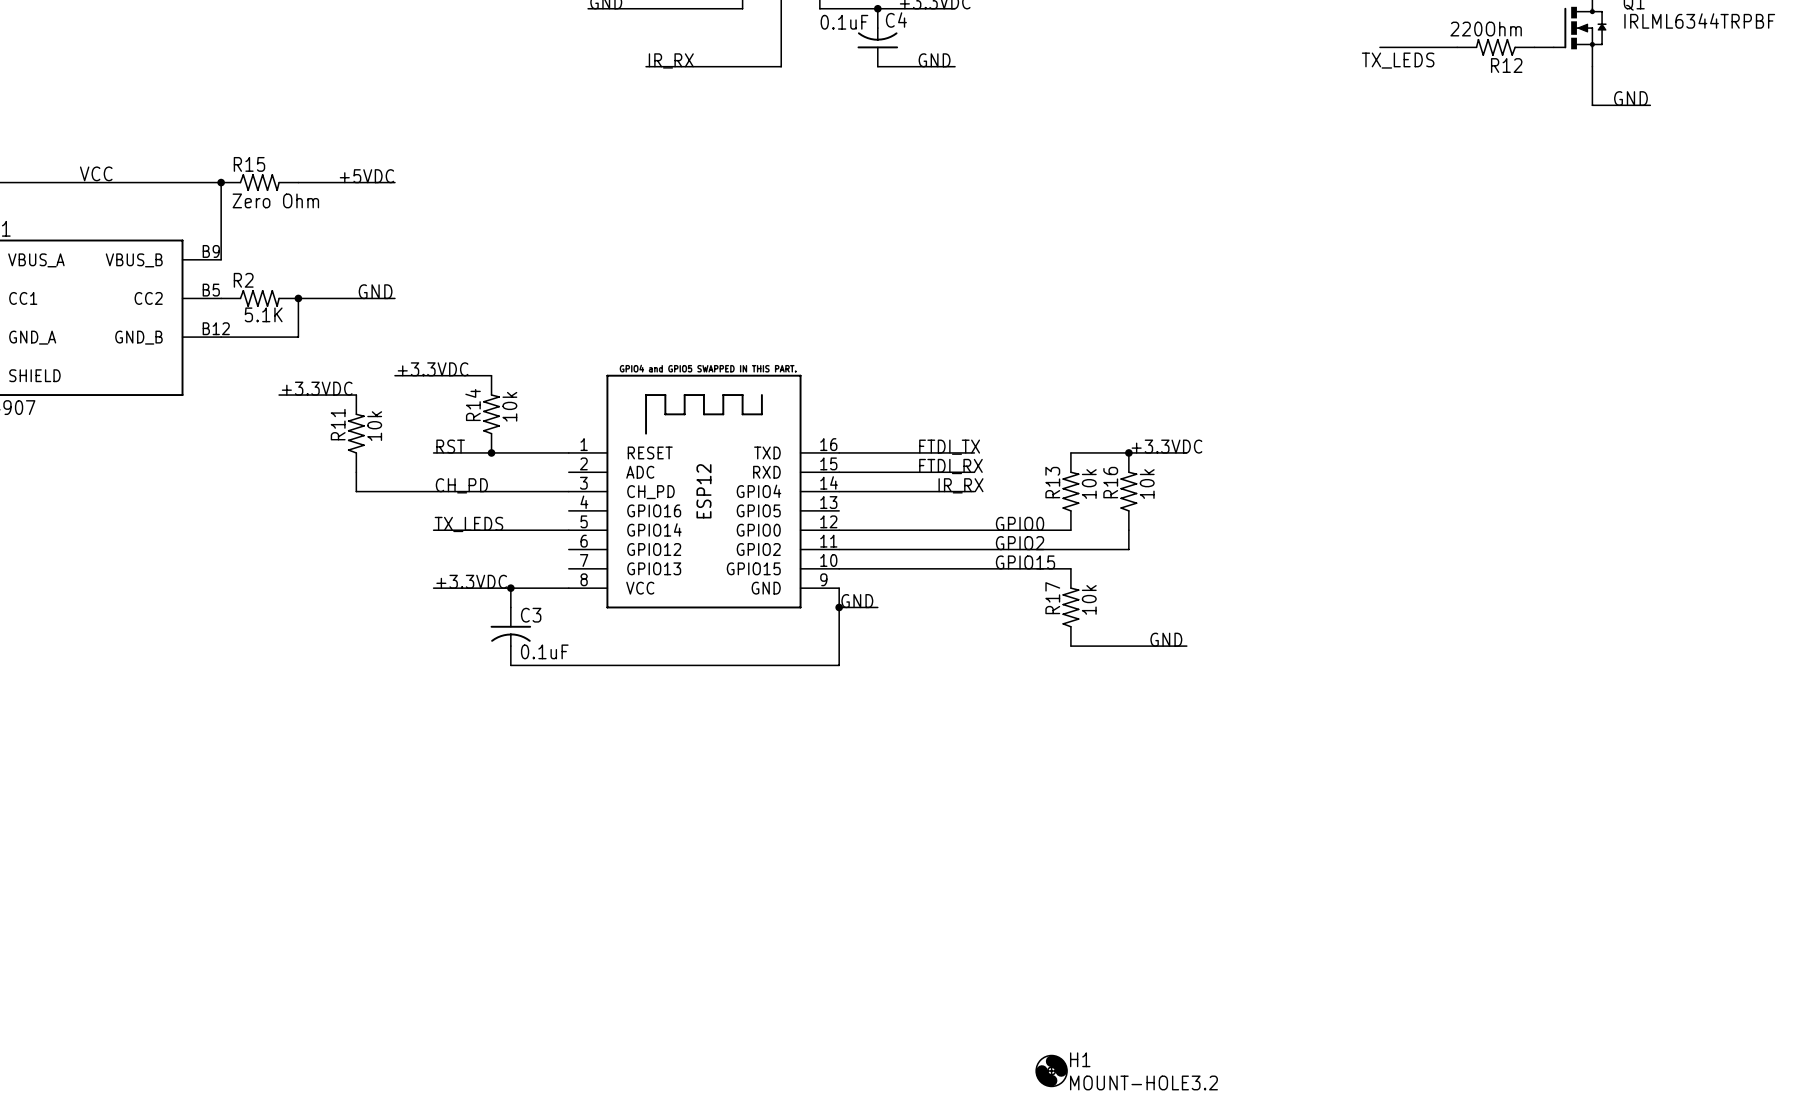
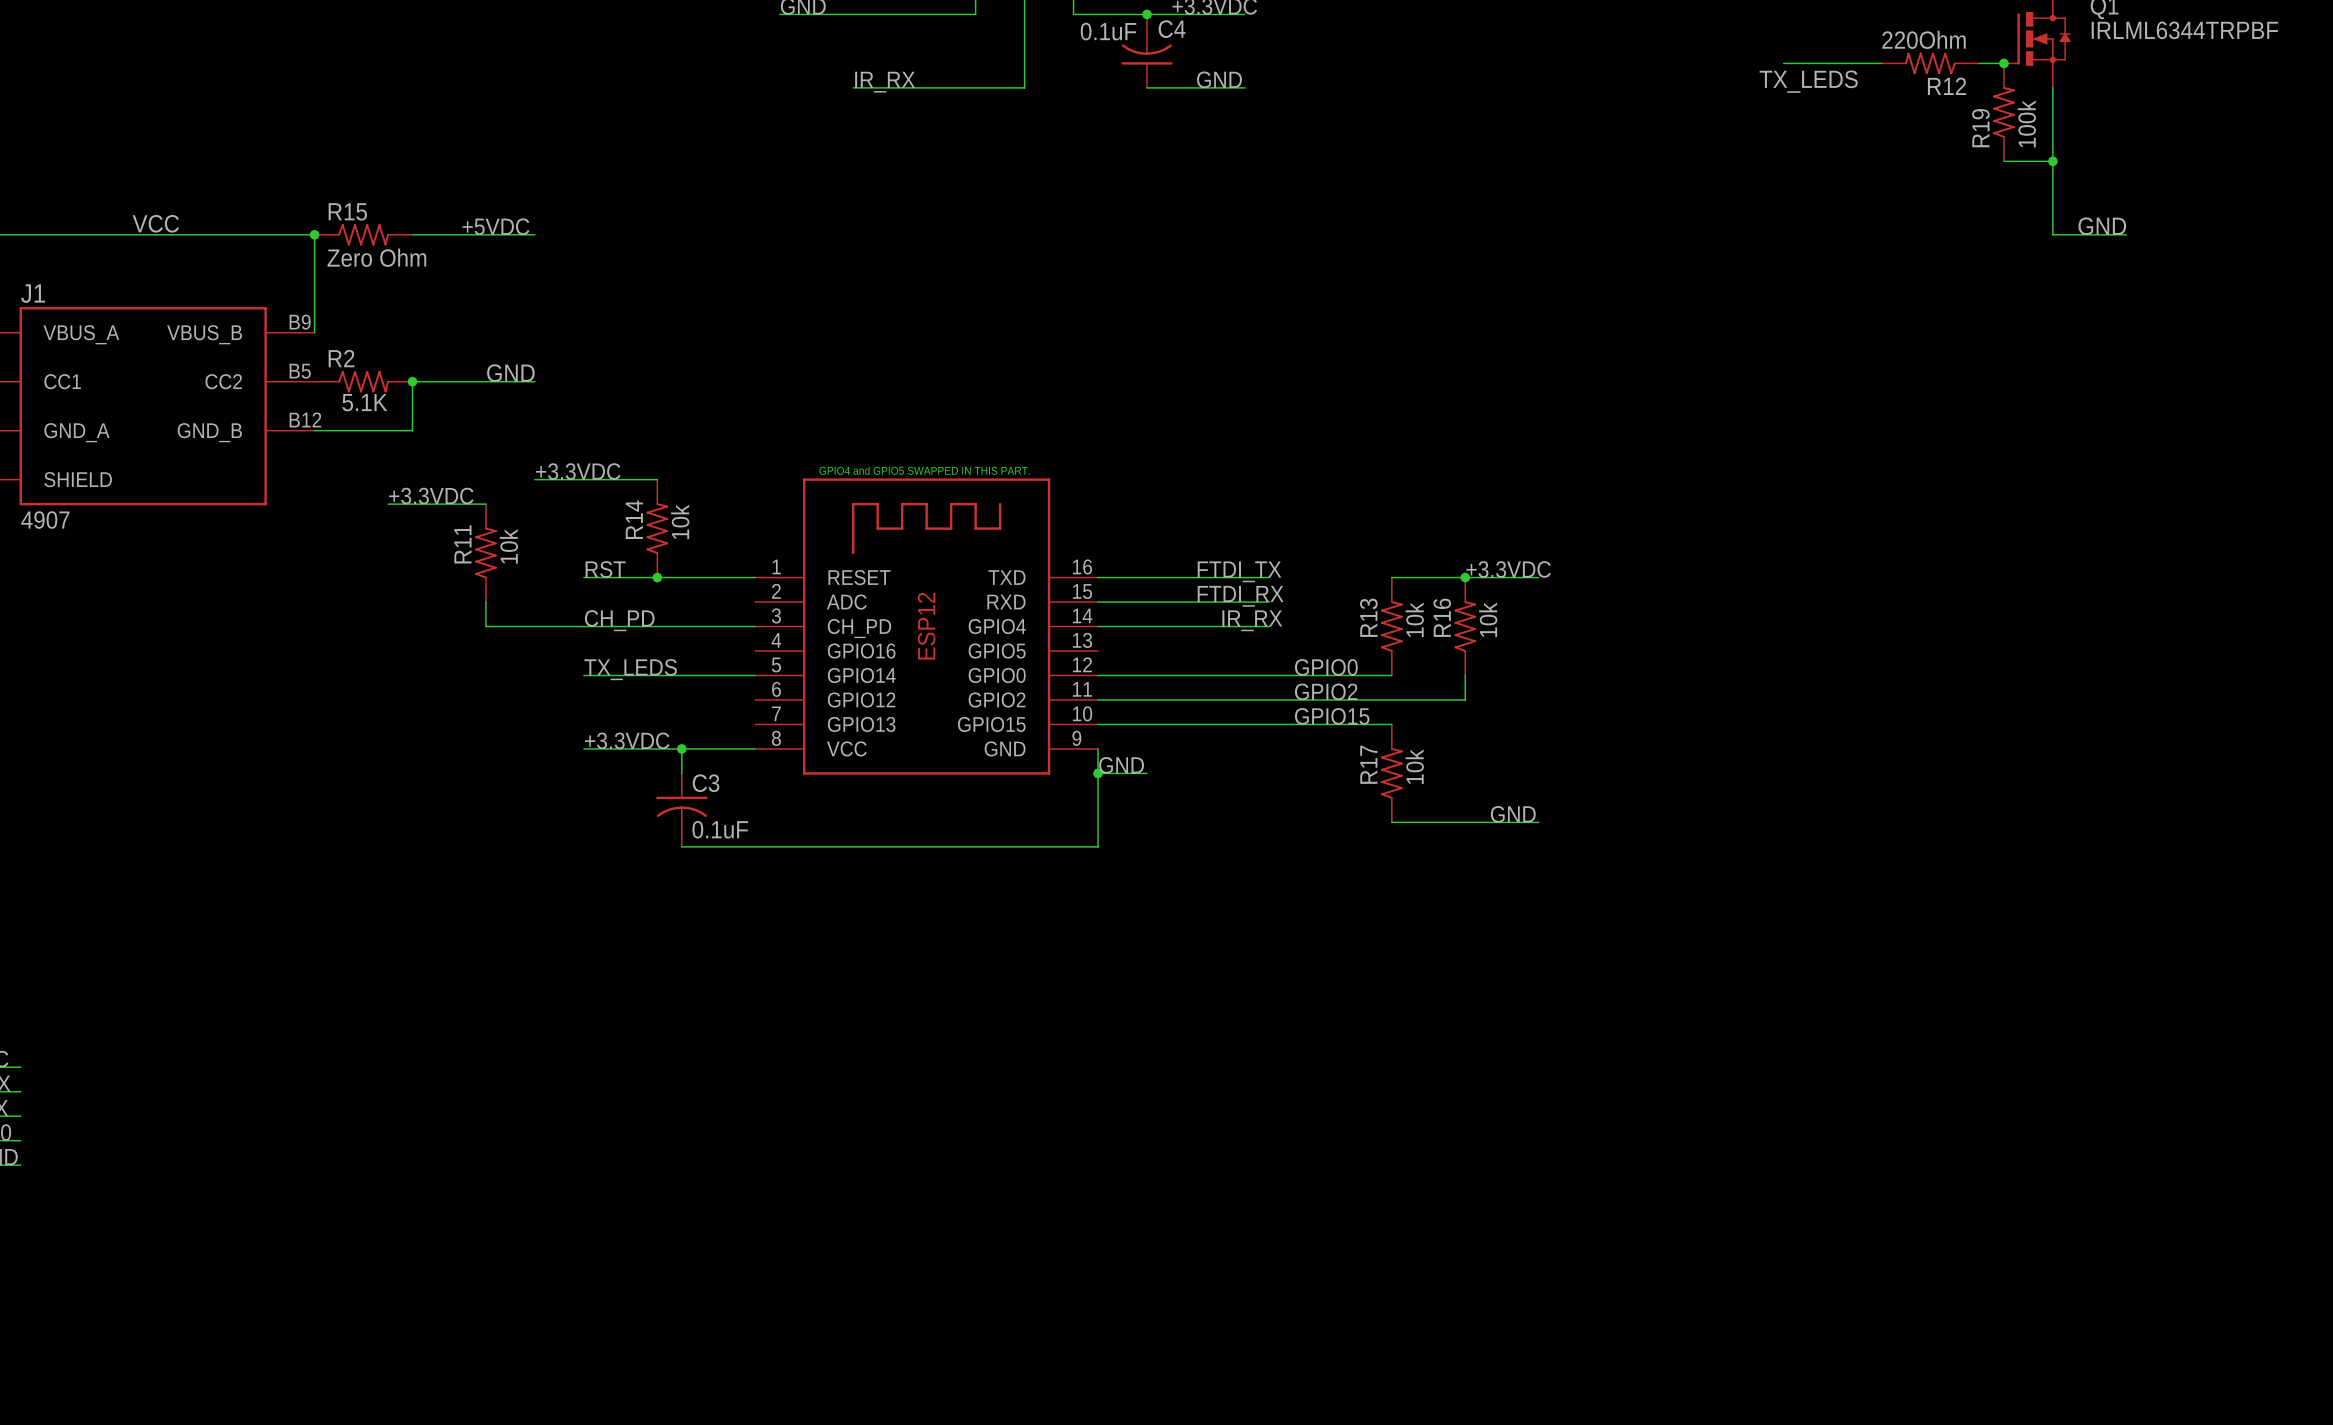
junction: none -> (2003, 63)
R19: none -> 100k (2003, 112)
label position: GND (1630, 98) -> GND (2102, 226)
wire: (1592, 105) (1650, 105) -> (2052, 136) (2052, 234) (2126, 234)
wire: none -> (2003, 161) (2052, 161)
junction: none -> (2052, 161)
H1: MOUNT-HOLE3.2 (1051, 1070) -> none

